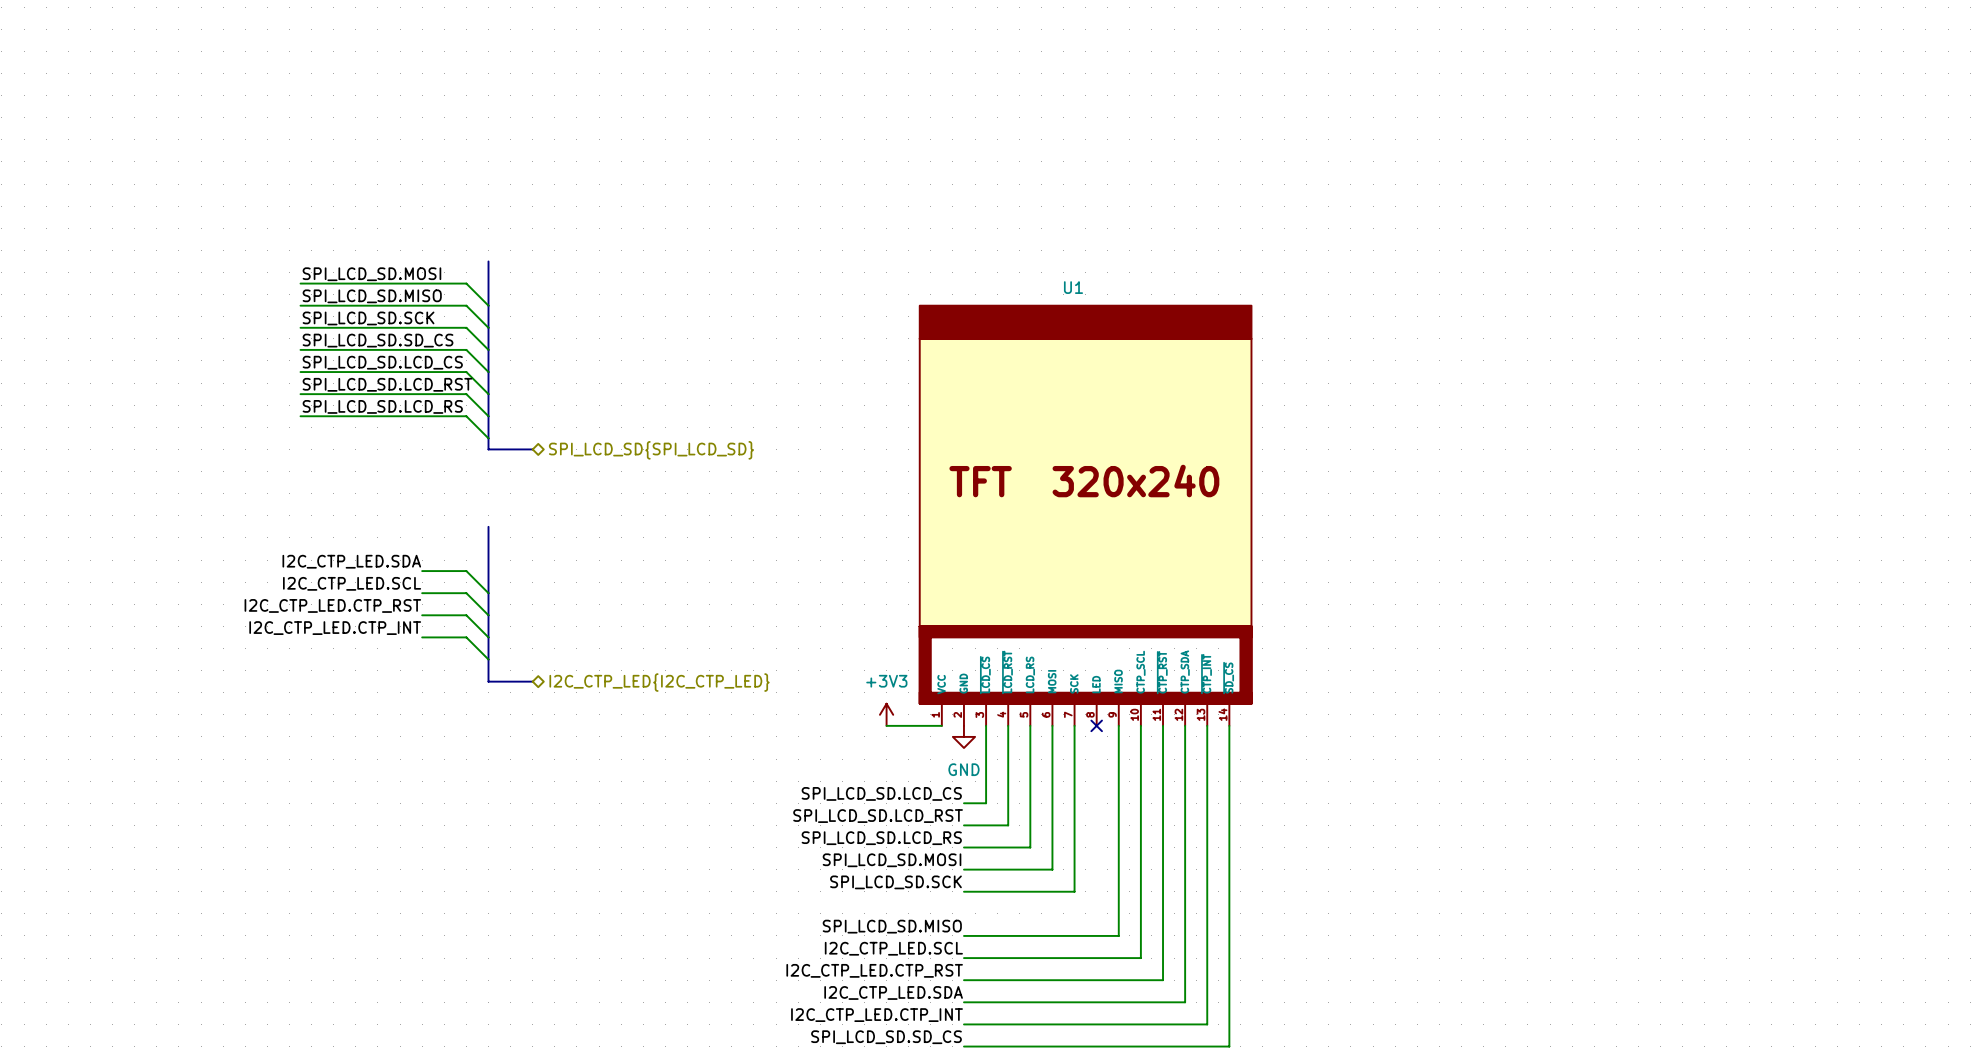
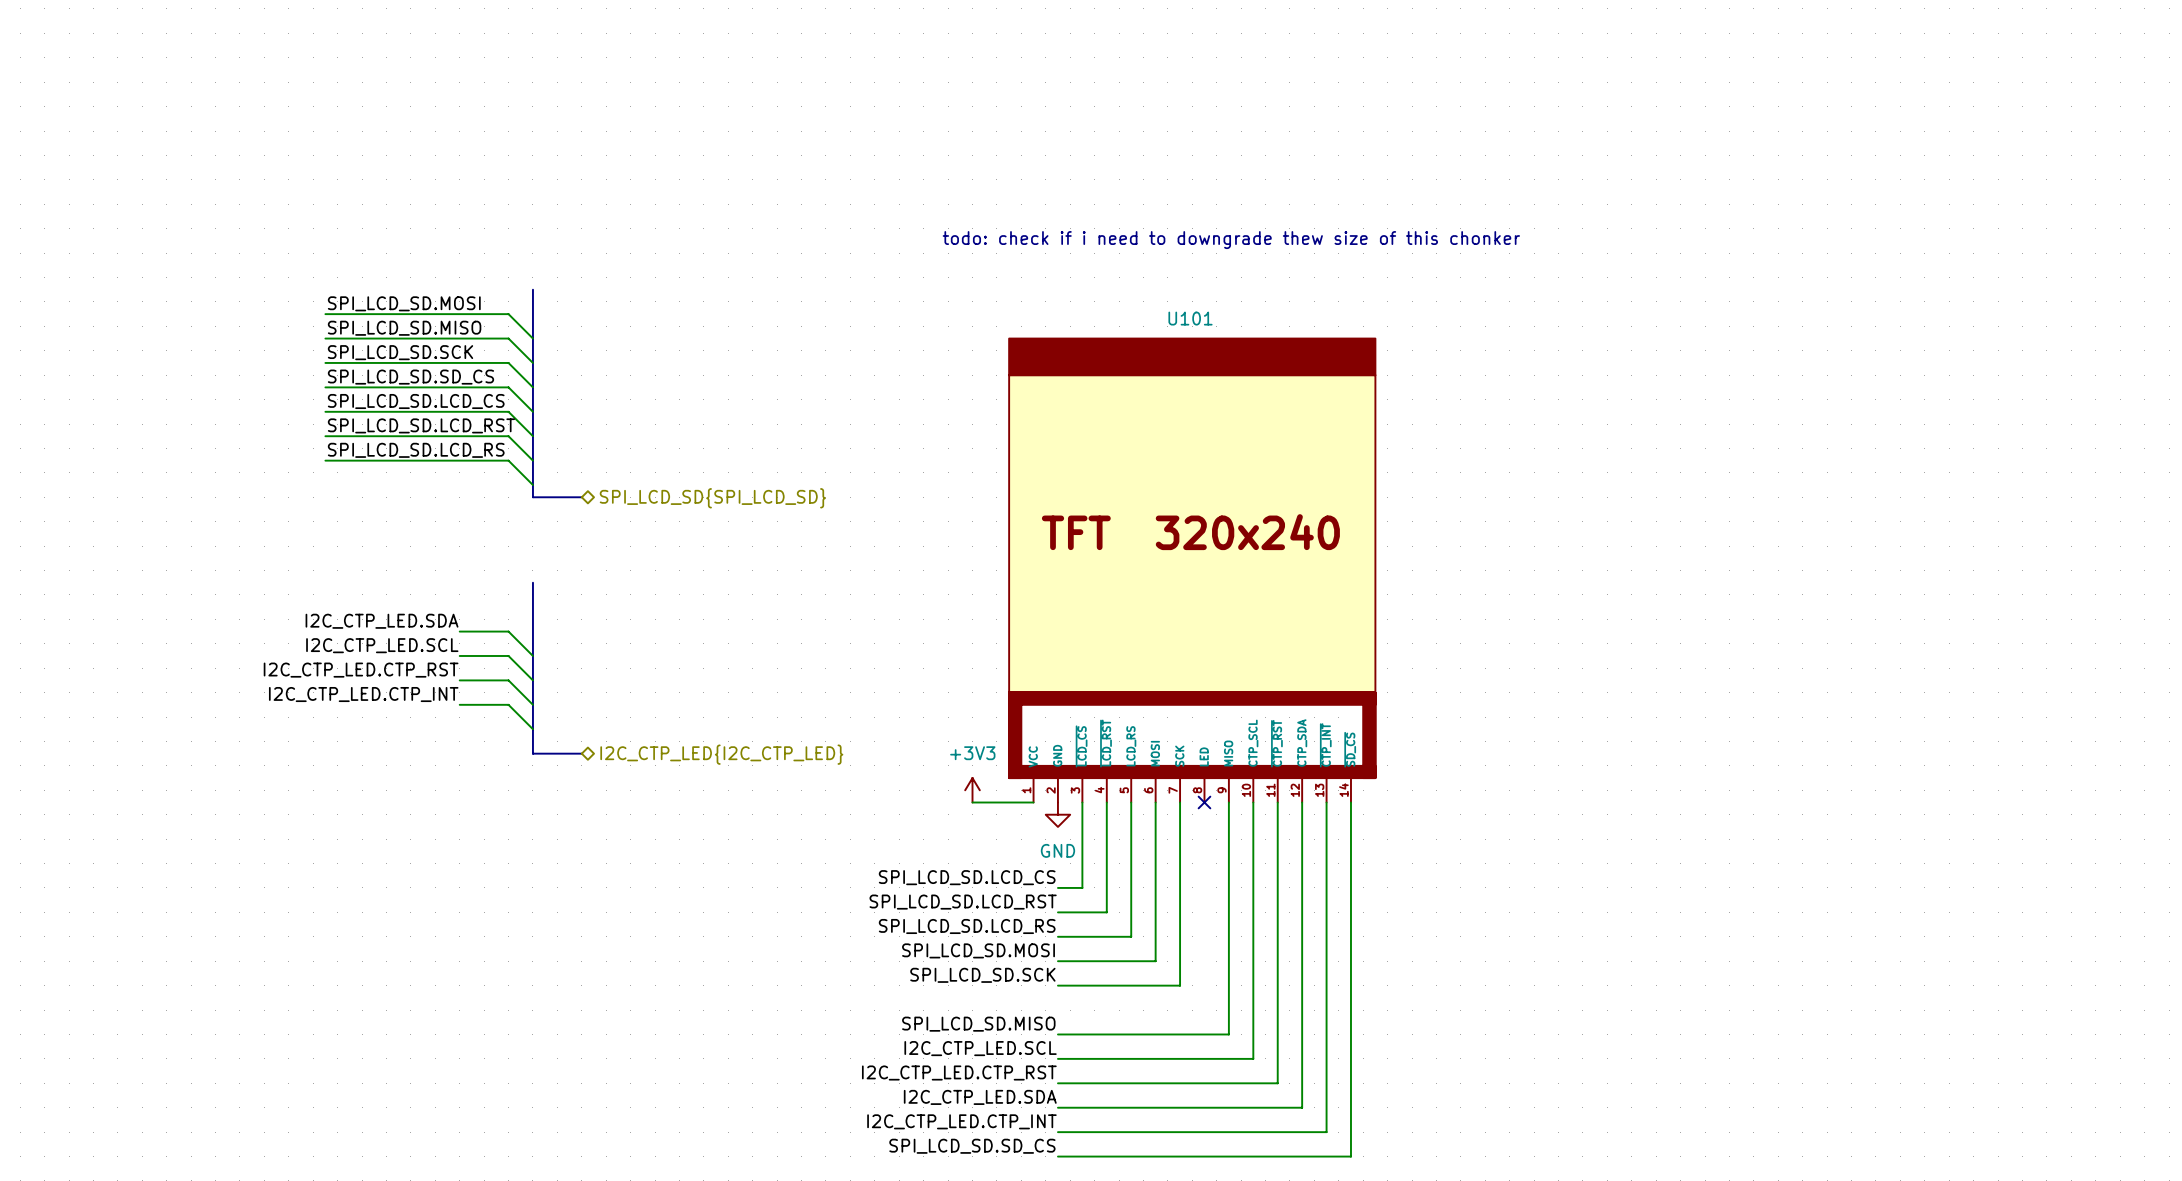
text: none -> todo: check if i need to downgrade thew size of this chonker (1231, 240)
U1 name: U1 (1073, 287) -> U101 (1190, 318)

